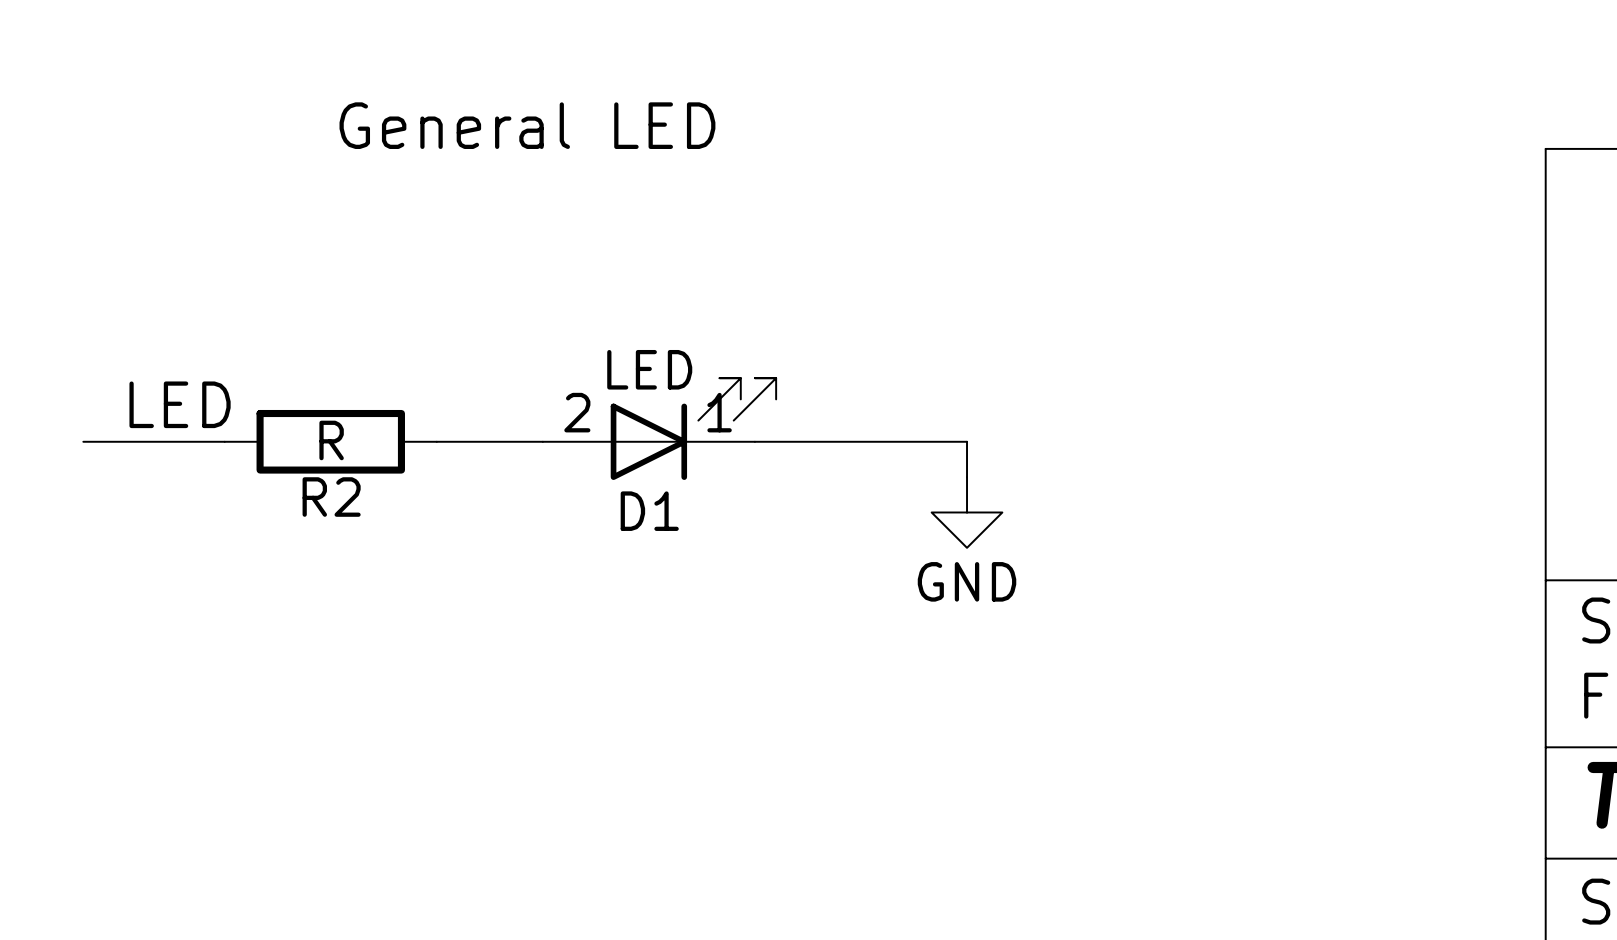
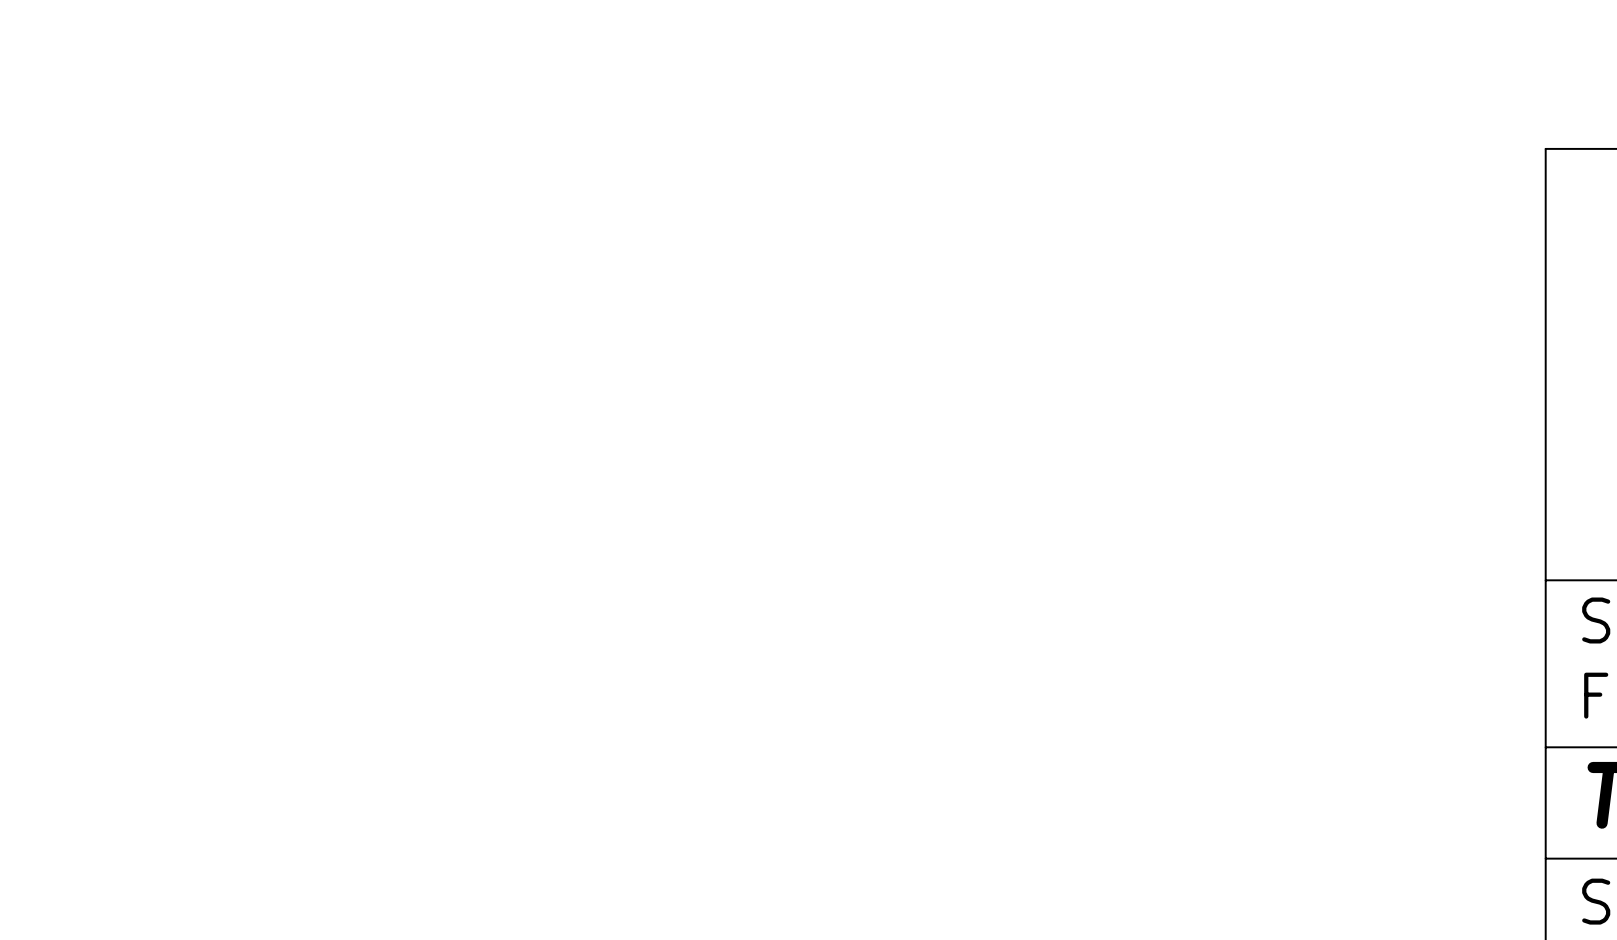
text: General LED (527, 125) -> none
label: LED (180, 404) -> none
D1: LED (659, 429) -> none
wire: (83, 441) (224, 441) -> none
R2: R (330, 441) -> none
wire: (436, 441) (542, 441) -> none
wire: (754, 441) (967, 441) (967, 477) -> none
power symbol: GND (967, 512) -> none

